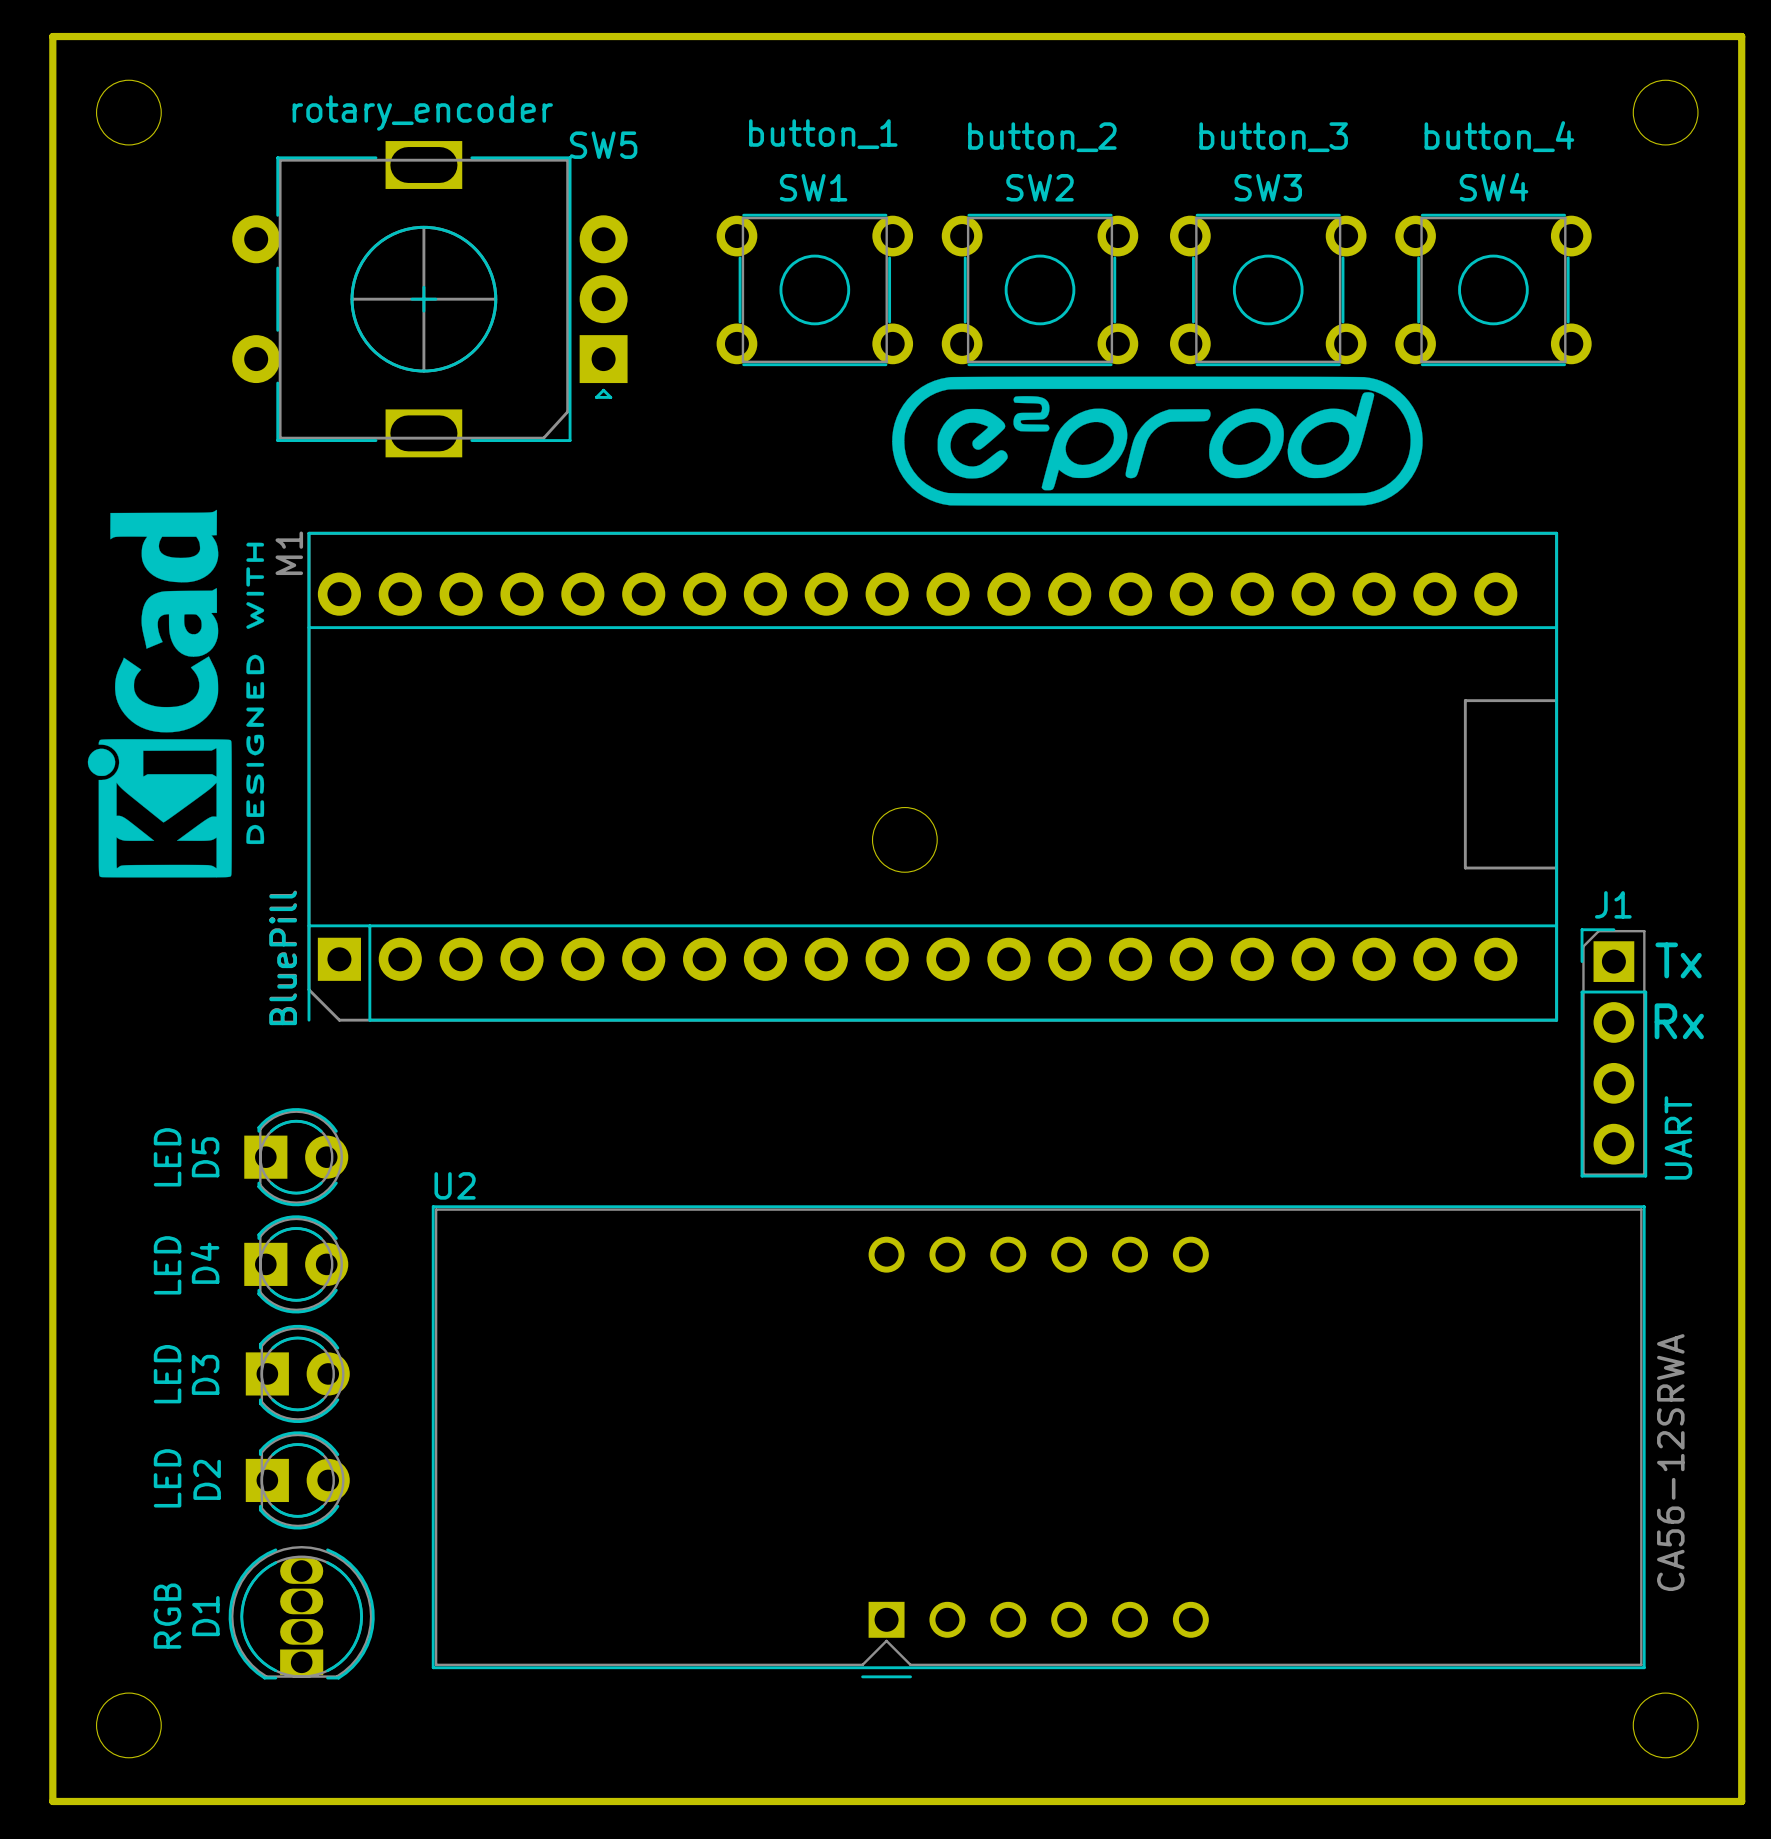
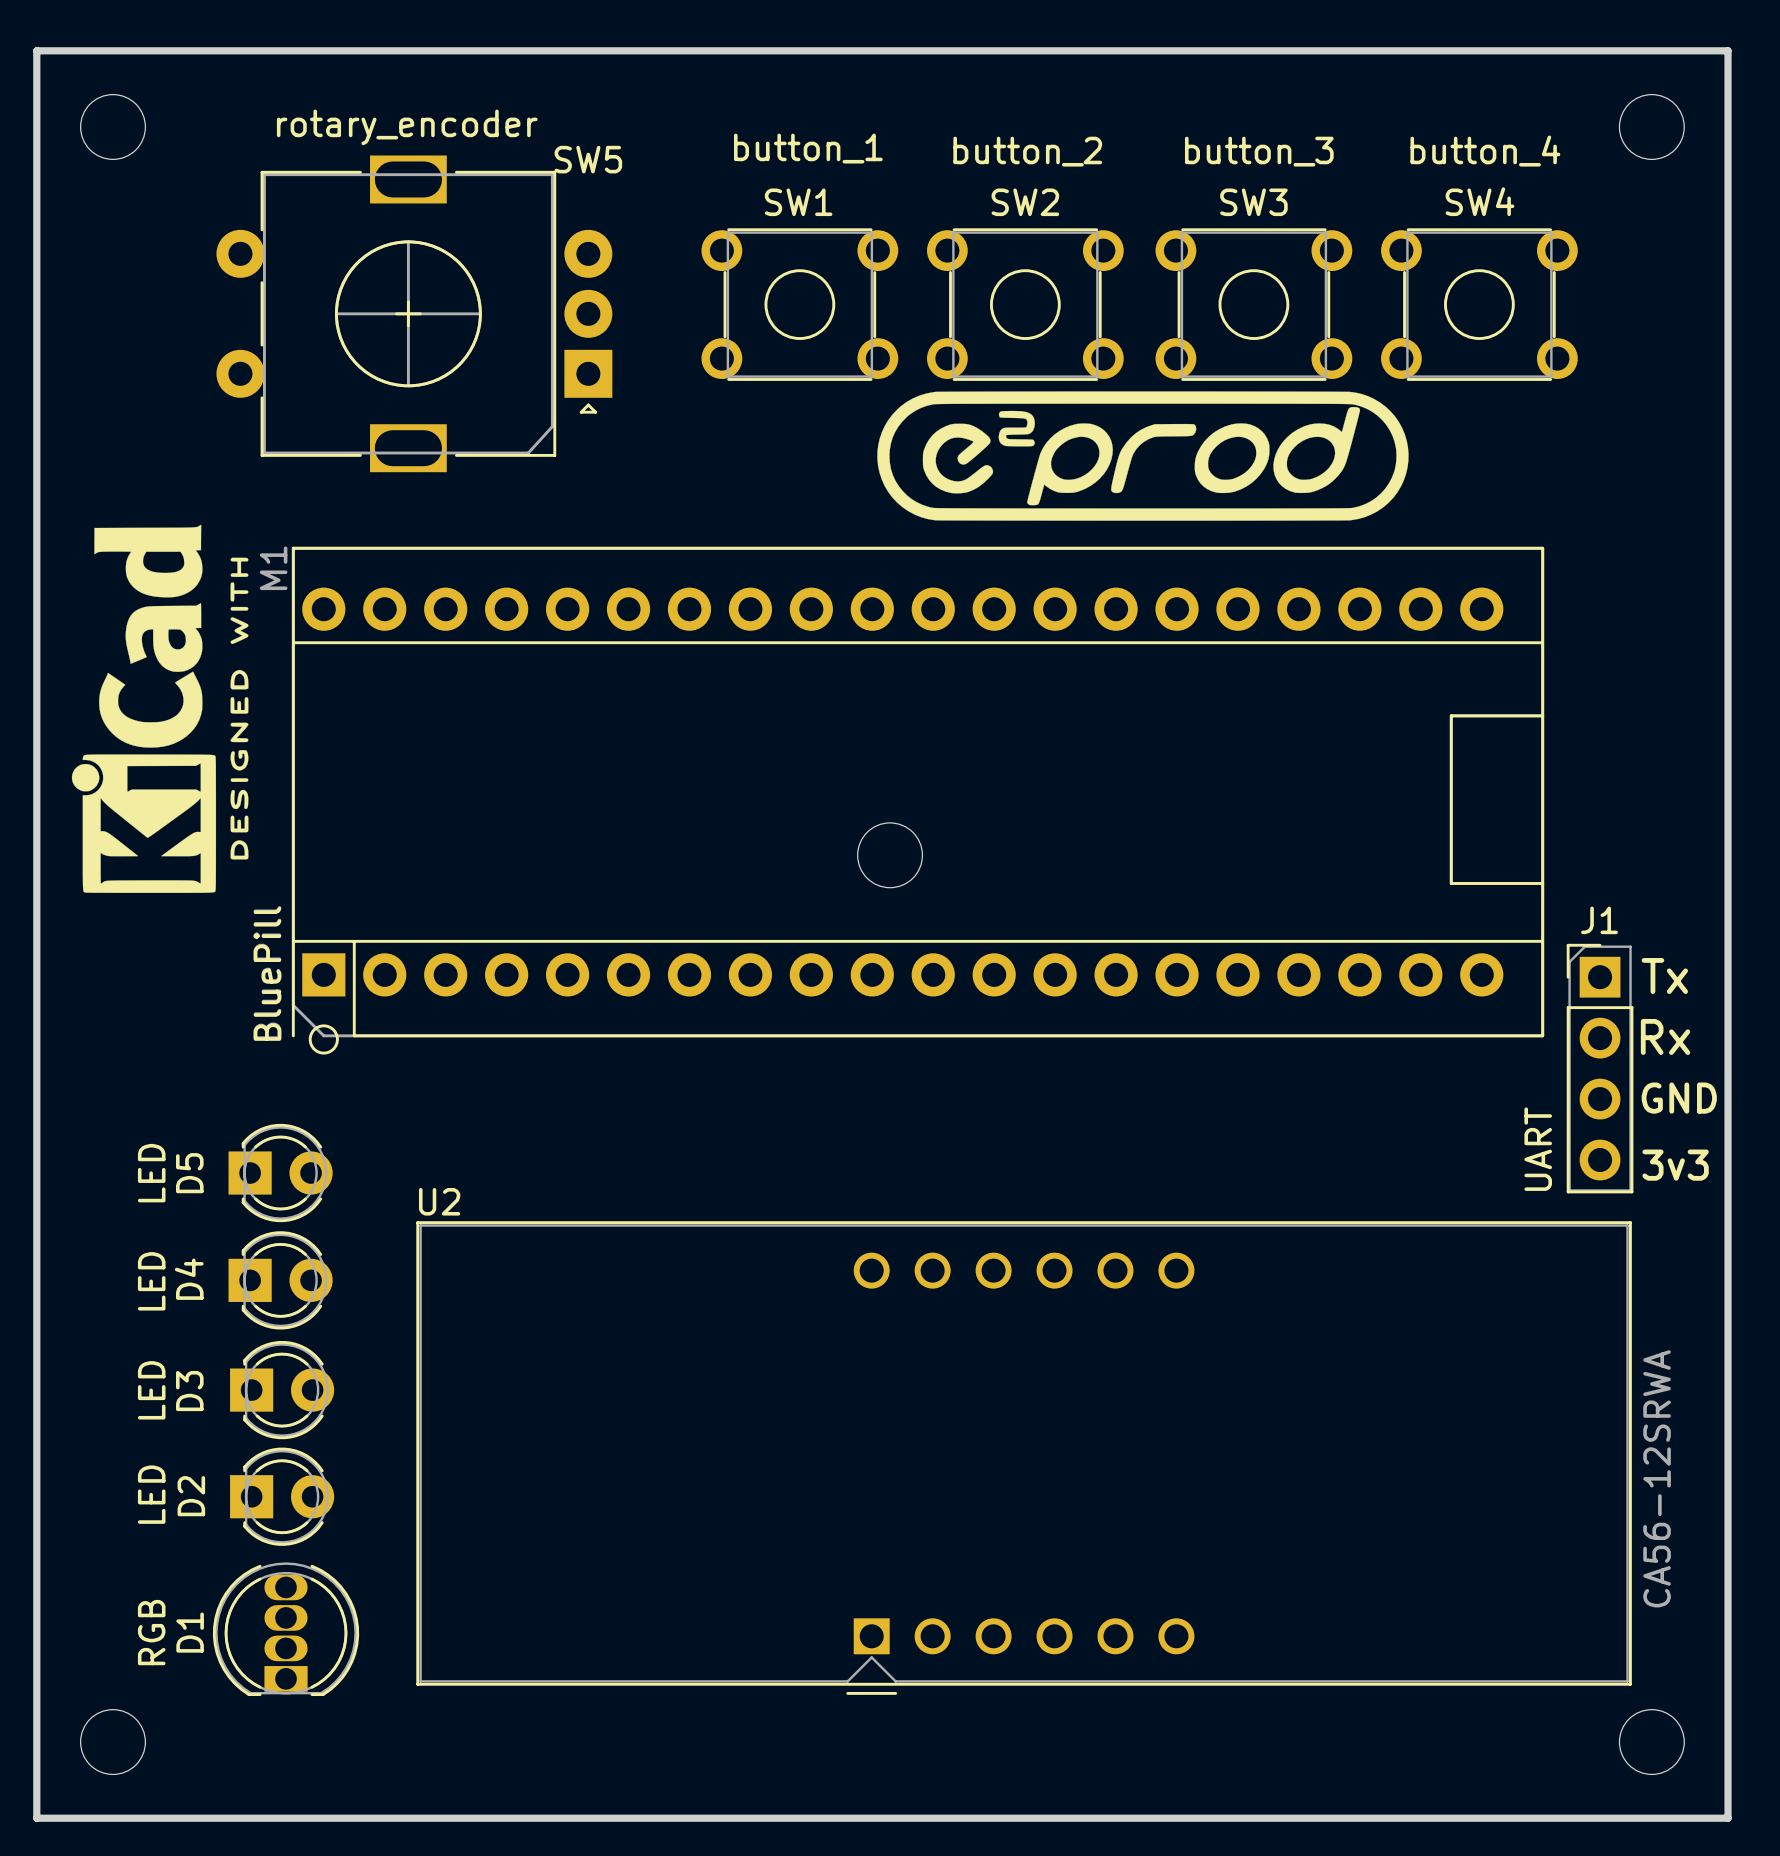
M1 footprint: [307, 531, 1559, 1022] -> [291, 546, 1545, 1055]
text: none -> GND (1679, 1098)
J1 value position: UART (1678, 1137) -> UART (1538, 1149)
text: none -> 3v3 (1675, 1165)

